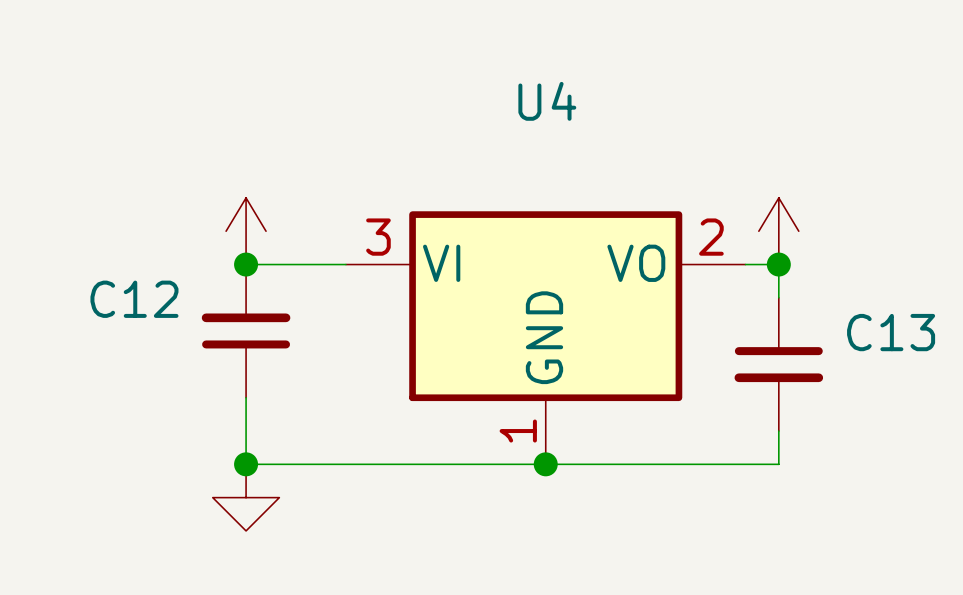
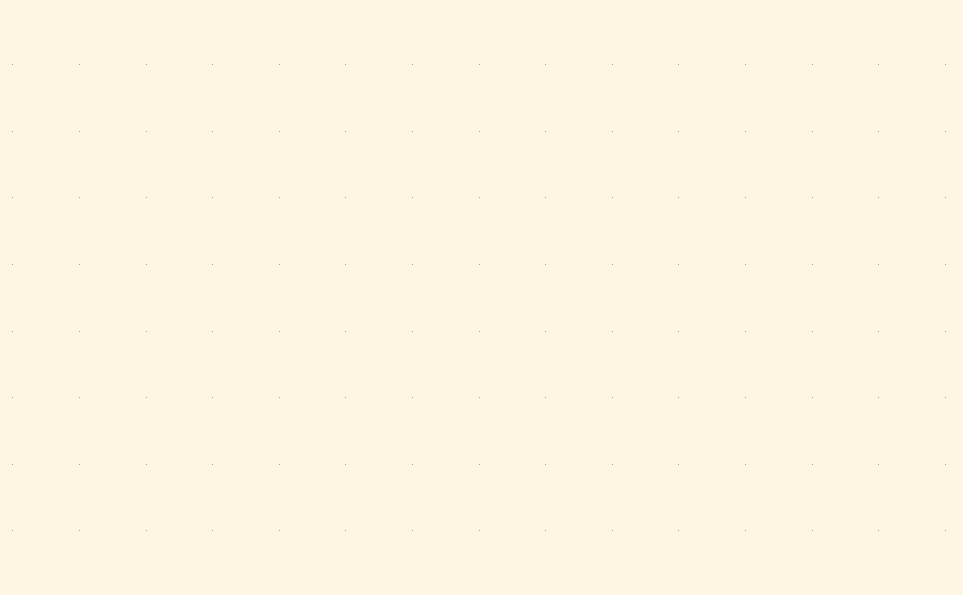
power symbol: (246, 231) -> none
power symbol: (778, 231) -> none
wire: (246, 264) (345, 264) -> none
junction: (246, 264) -> none
wire: (745, 264) (778, 264) (778, 297) -> none
junction: (778, 264) -> none
C12: (246, 331) -> none
U4: (545, 337) -> none
C13: (778, 364) -> none
wire: (246, 397) (246, 464) (778, 464) (778, 431) -> none
junction: (246, 464) -> none
junction: (545, 464) -> none
power symbol: (246, 497) -> none

